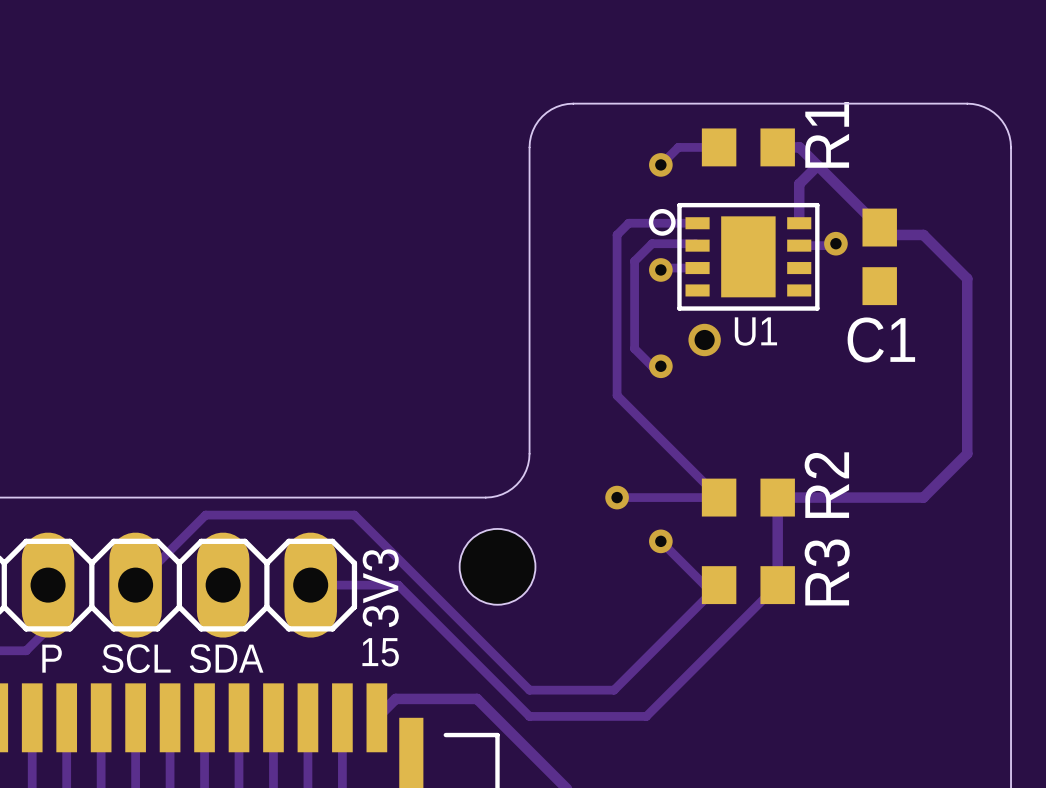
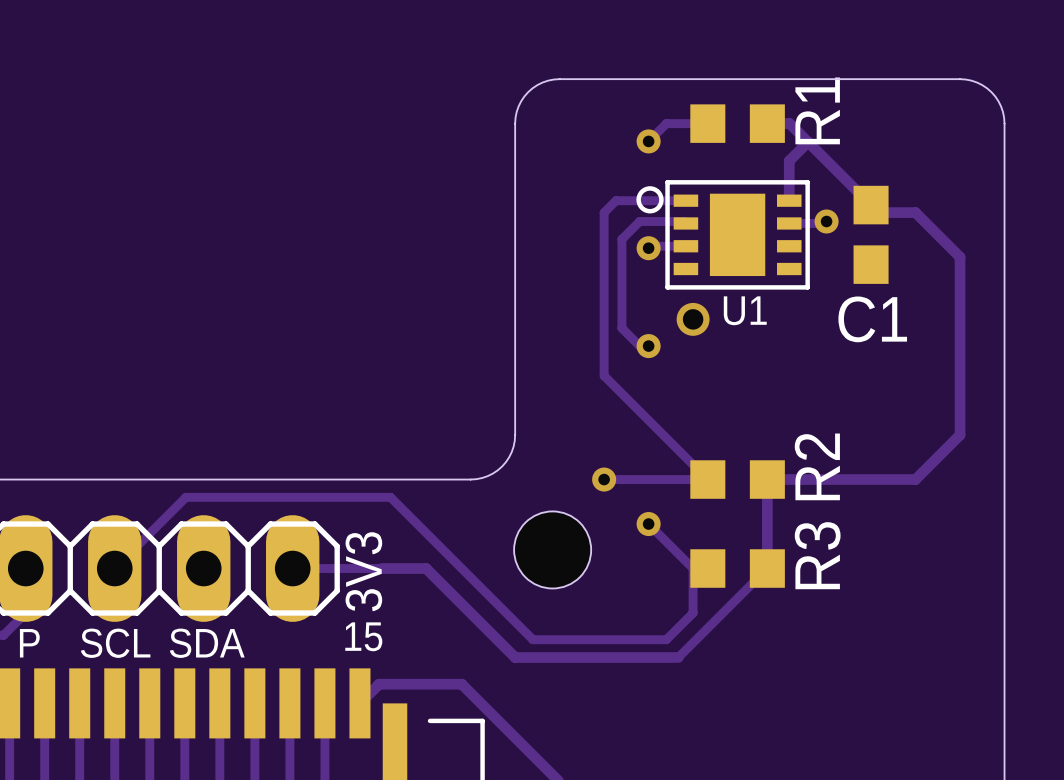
track: (354, 515) (529, 690) (614, 690) (719, 585) -> (337, 497) (390, 497) (532, 639) (666, 639) (693, 613) (693, 568)
hole position: (497, 566) -> (552, 549)
track: (398, 585) (529, 716) (646, 716) (690, 672) -> (381, 568) (426, 568) (515, 657) (678, 657)

